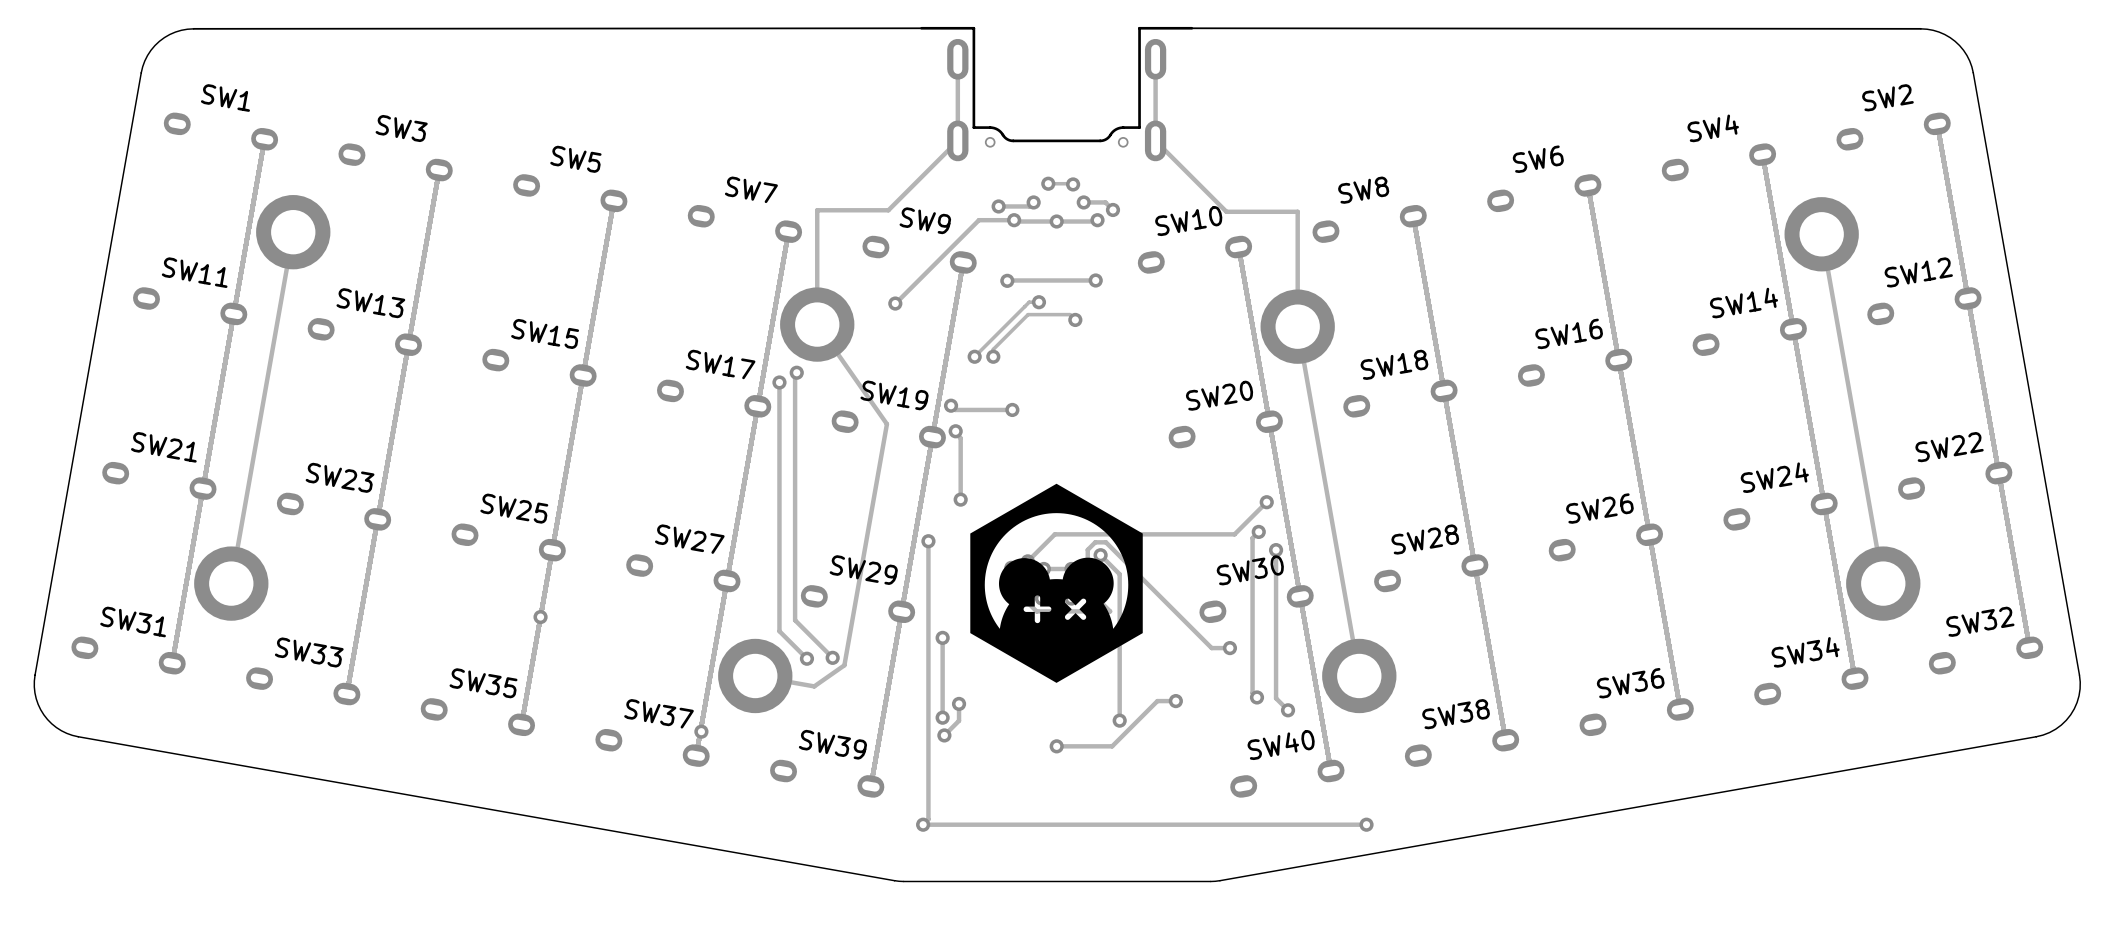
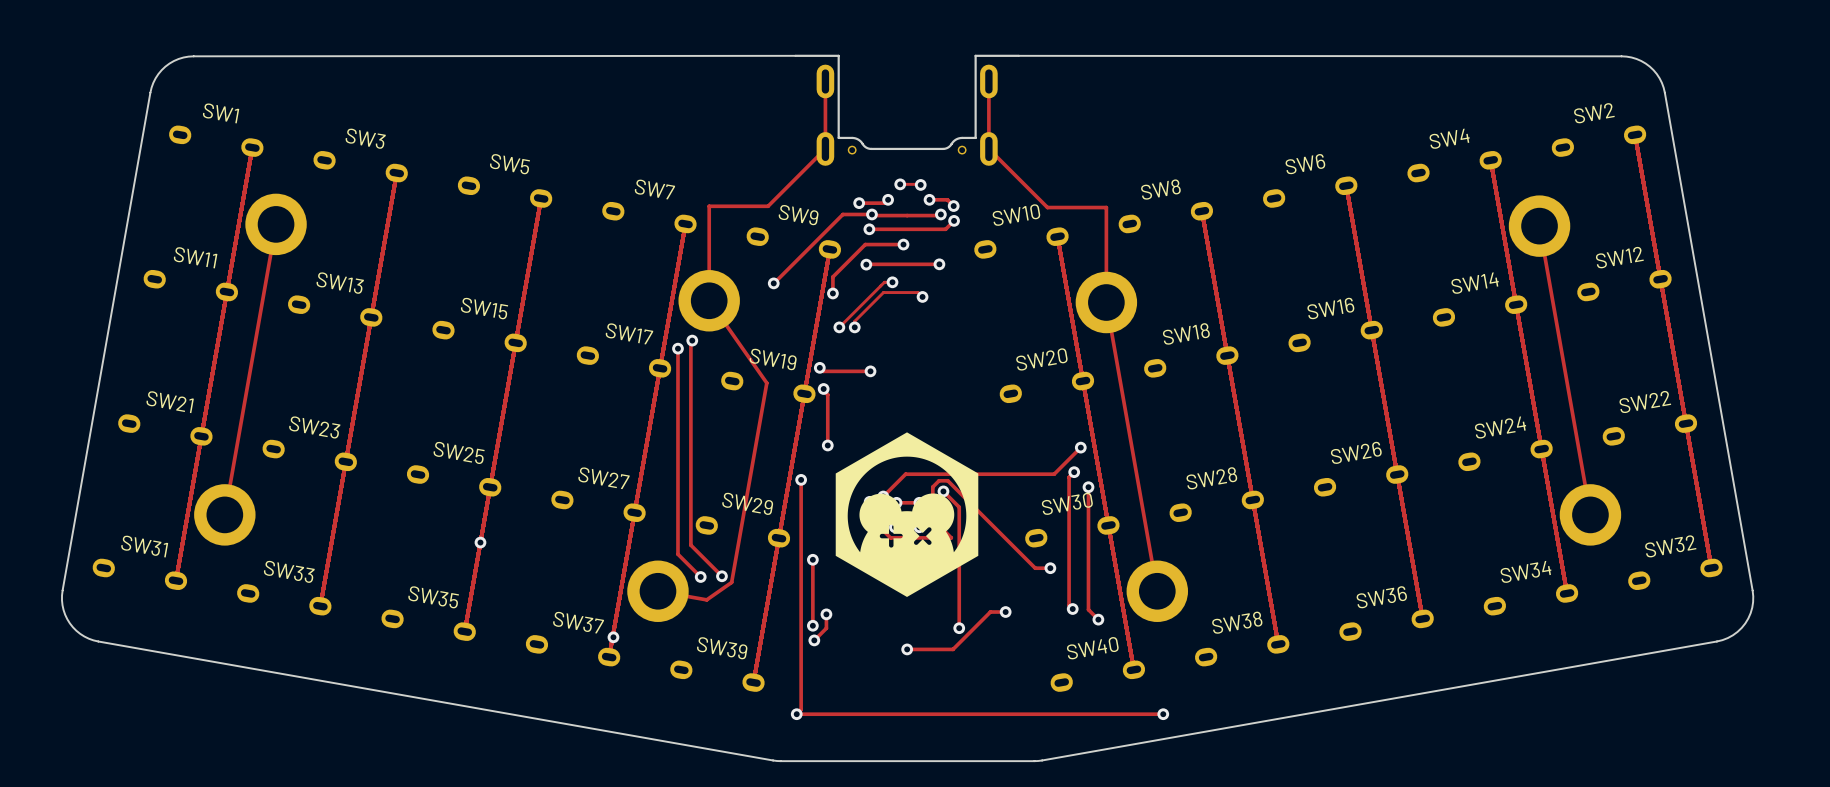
via: (1056, 221) -> none
track: none -> (954, 220) (945, 229) (869, 229)
via: none -> (954, 220)
via: none -> (869, 229)
track: none -> (903, 244) (865, 244) (832, 276) (832, 293)
via: none -> (903, 244)
via: none -> (832, 293)

